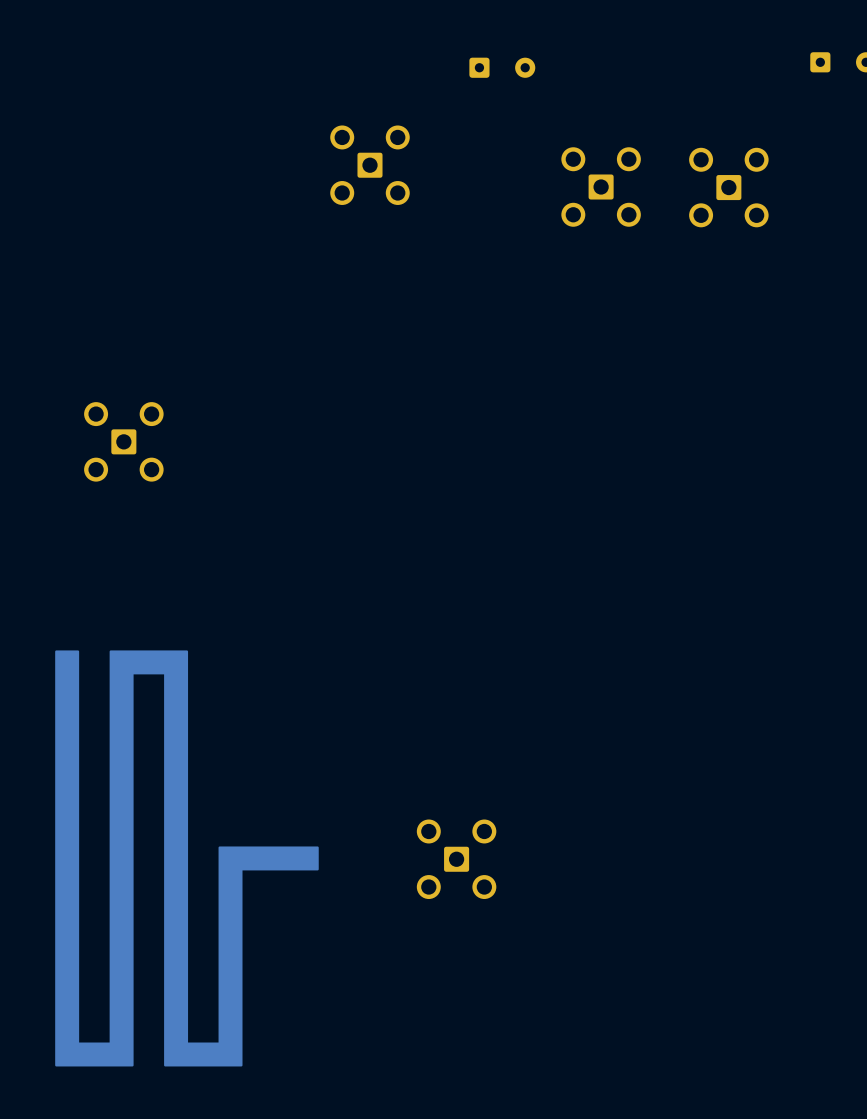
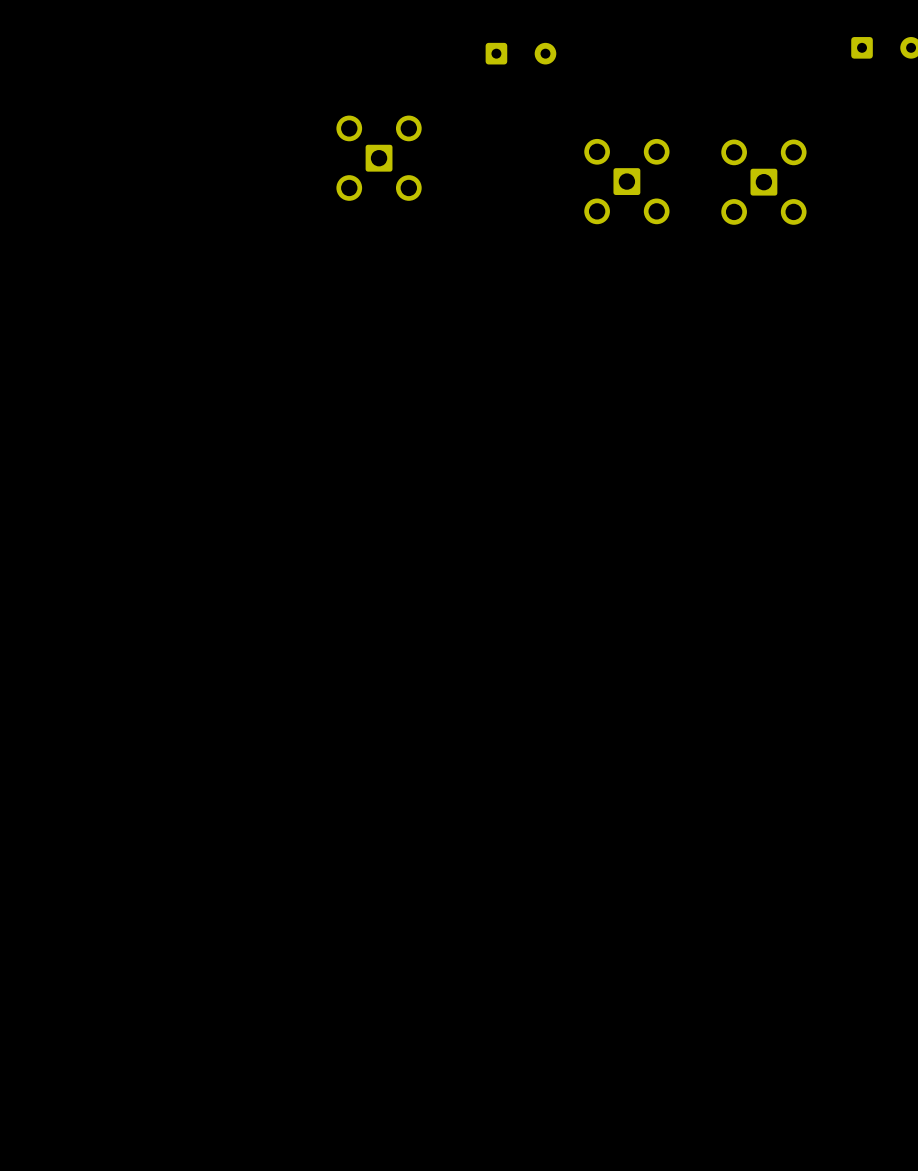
part: (123, 441) -> none
part: (186, 858) -> none
part: (456, 859) -> none

